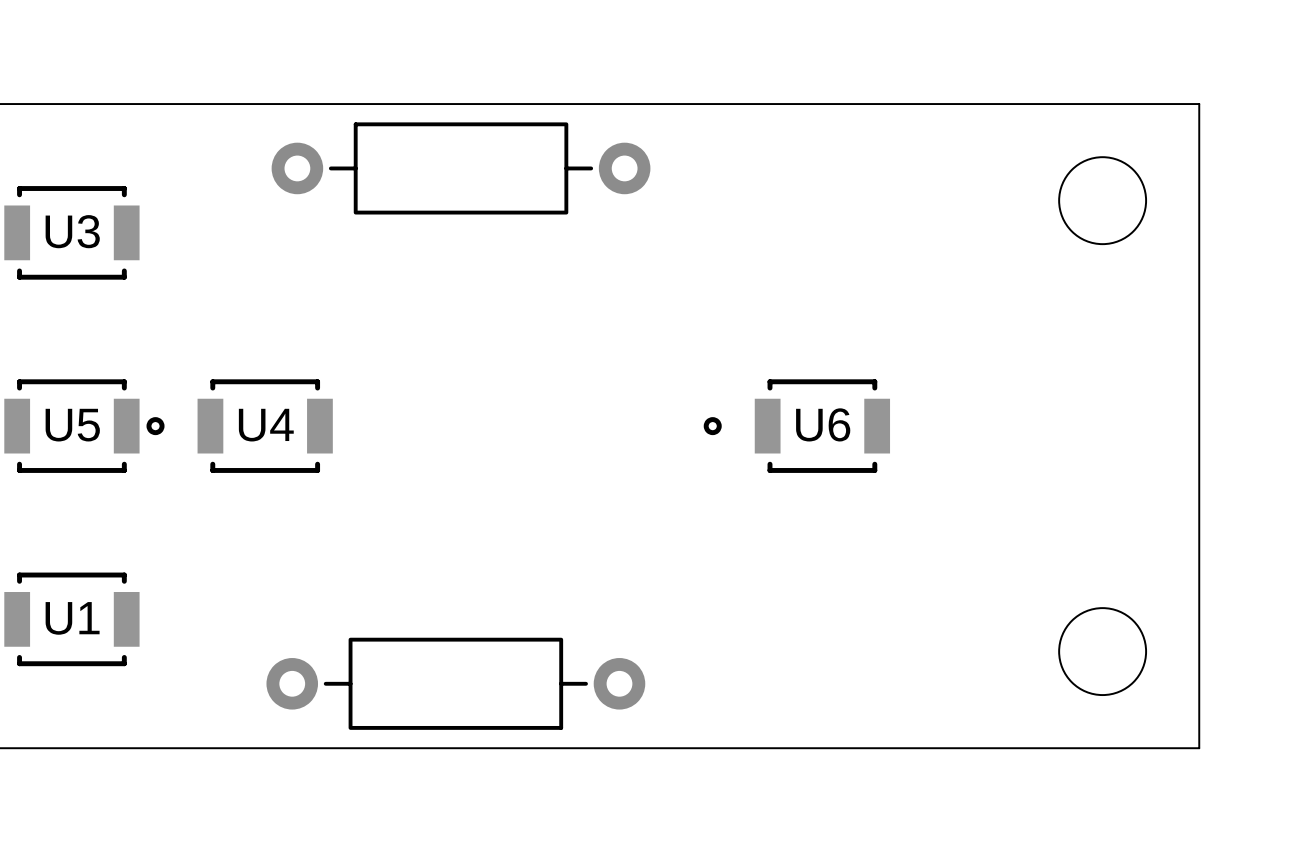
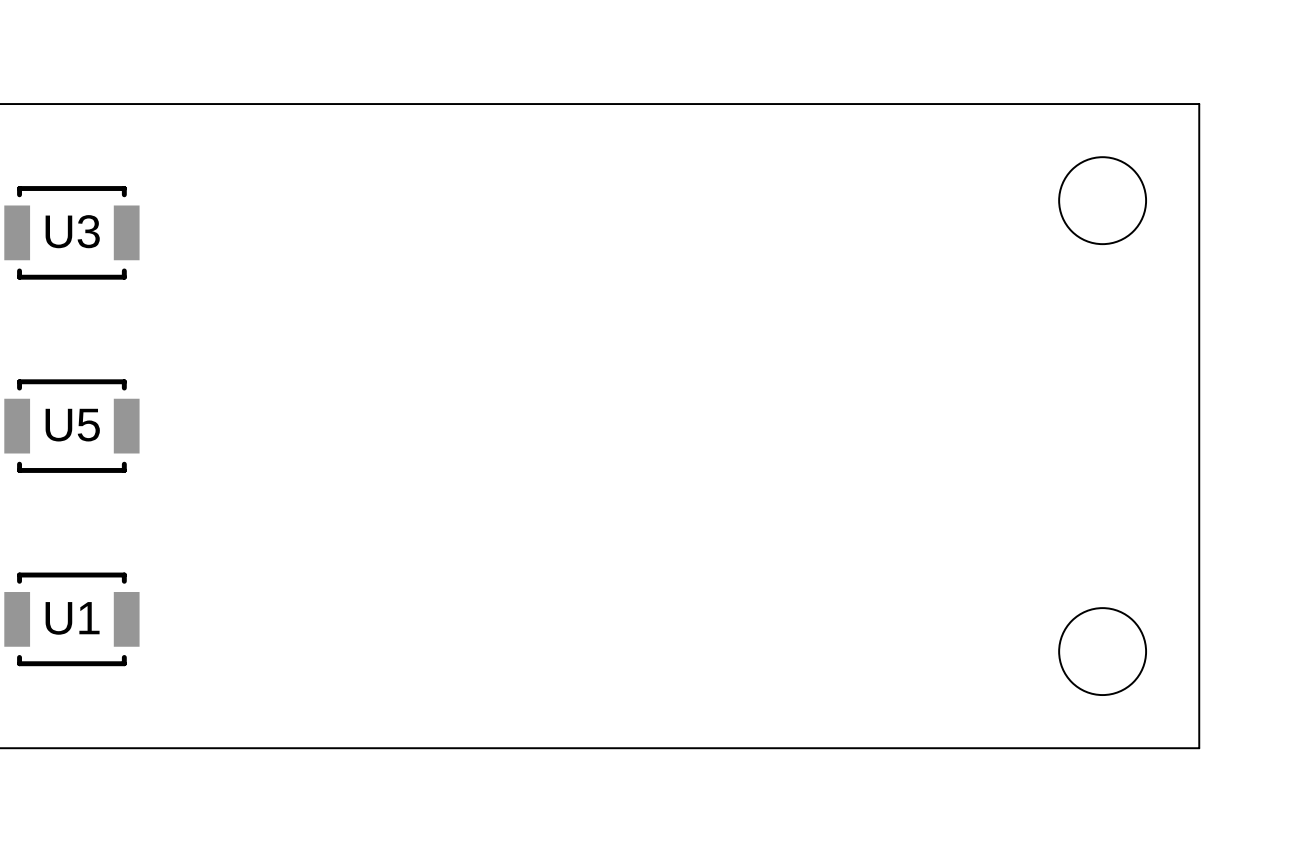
part: (461, 168) -> none
U4: (239, 426) -> none
U6: (796, 426) -> none
part: (455, 683) -> none

